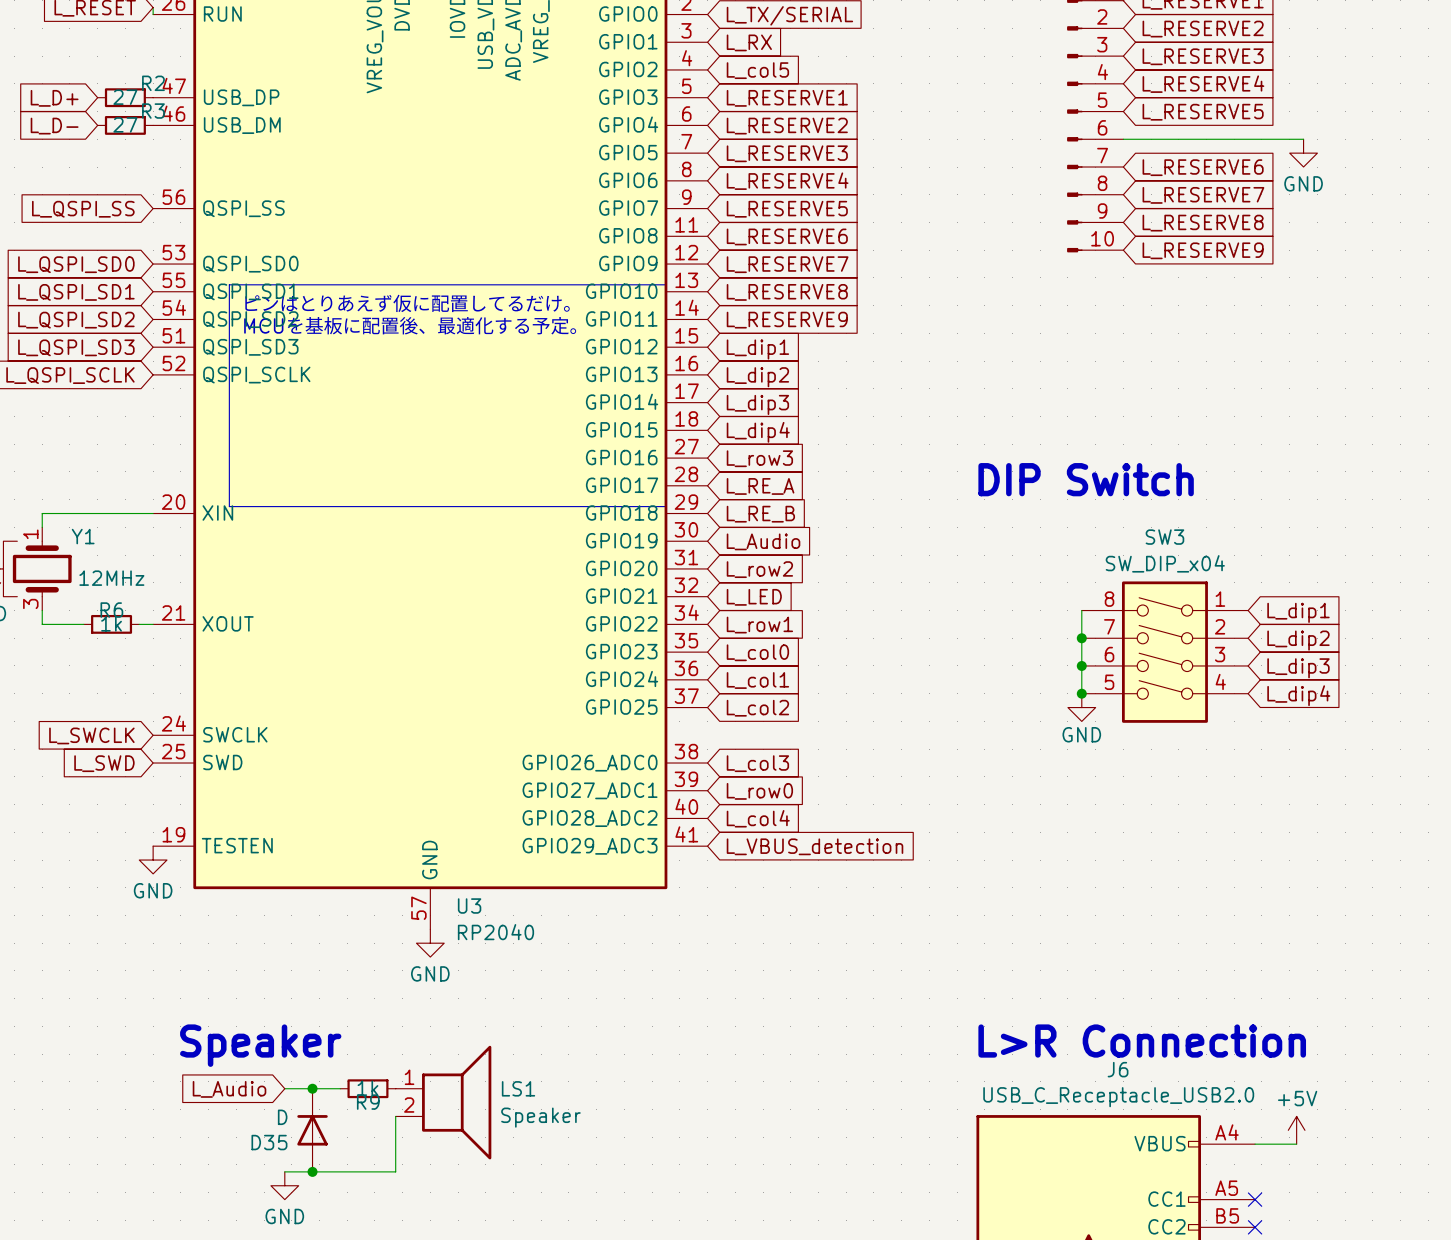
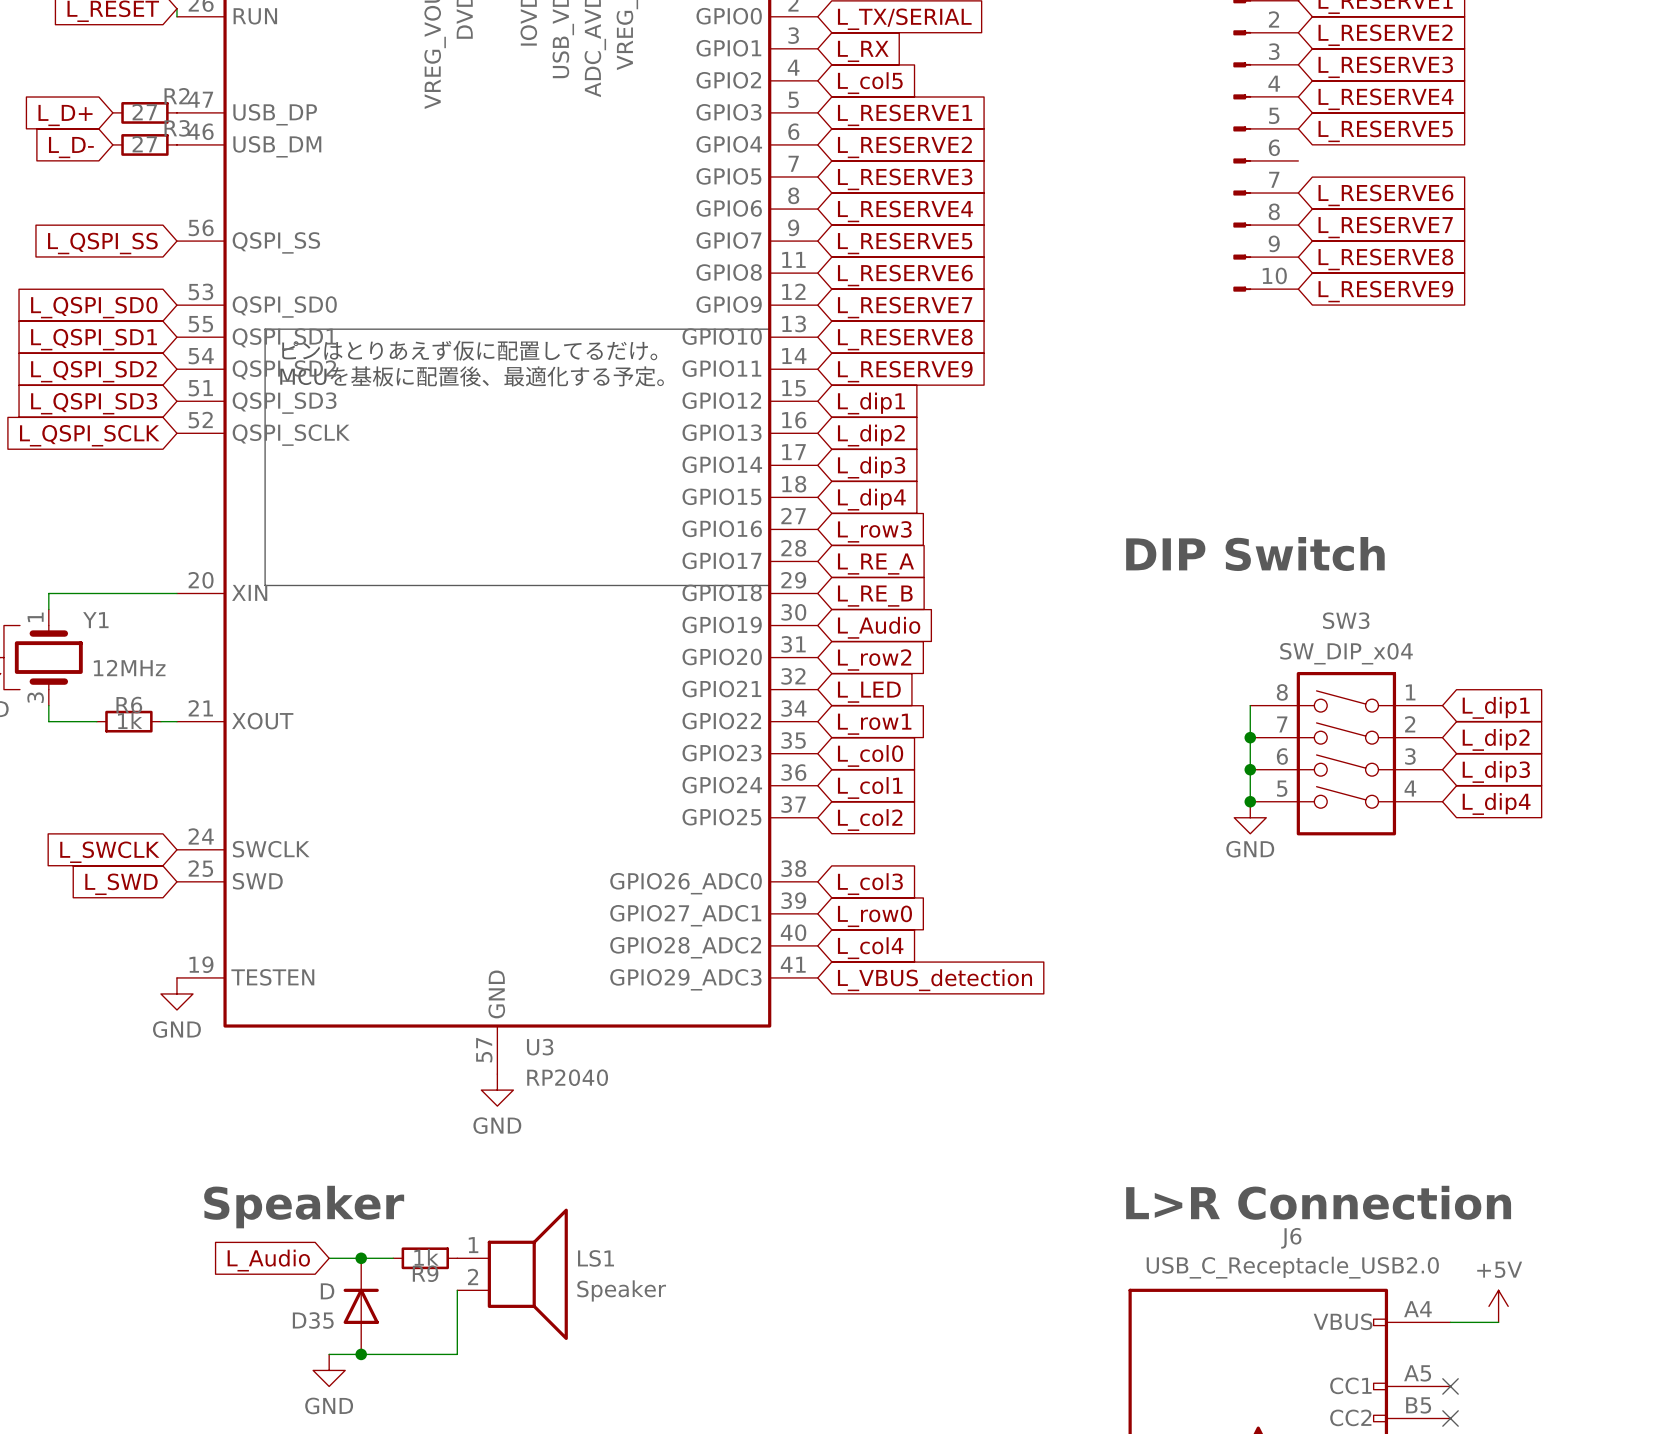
wire: (1123, 139) (1303, 139) -> none
power symbol: GND (1303, 153) -> none

